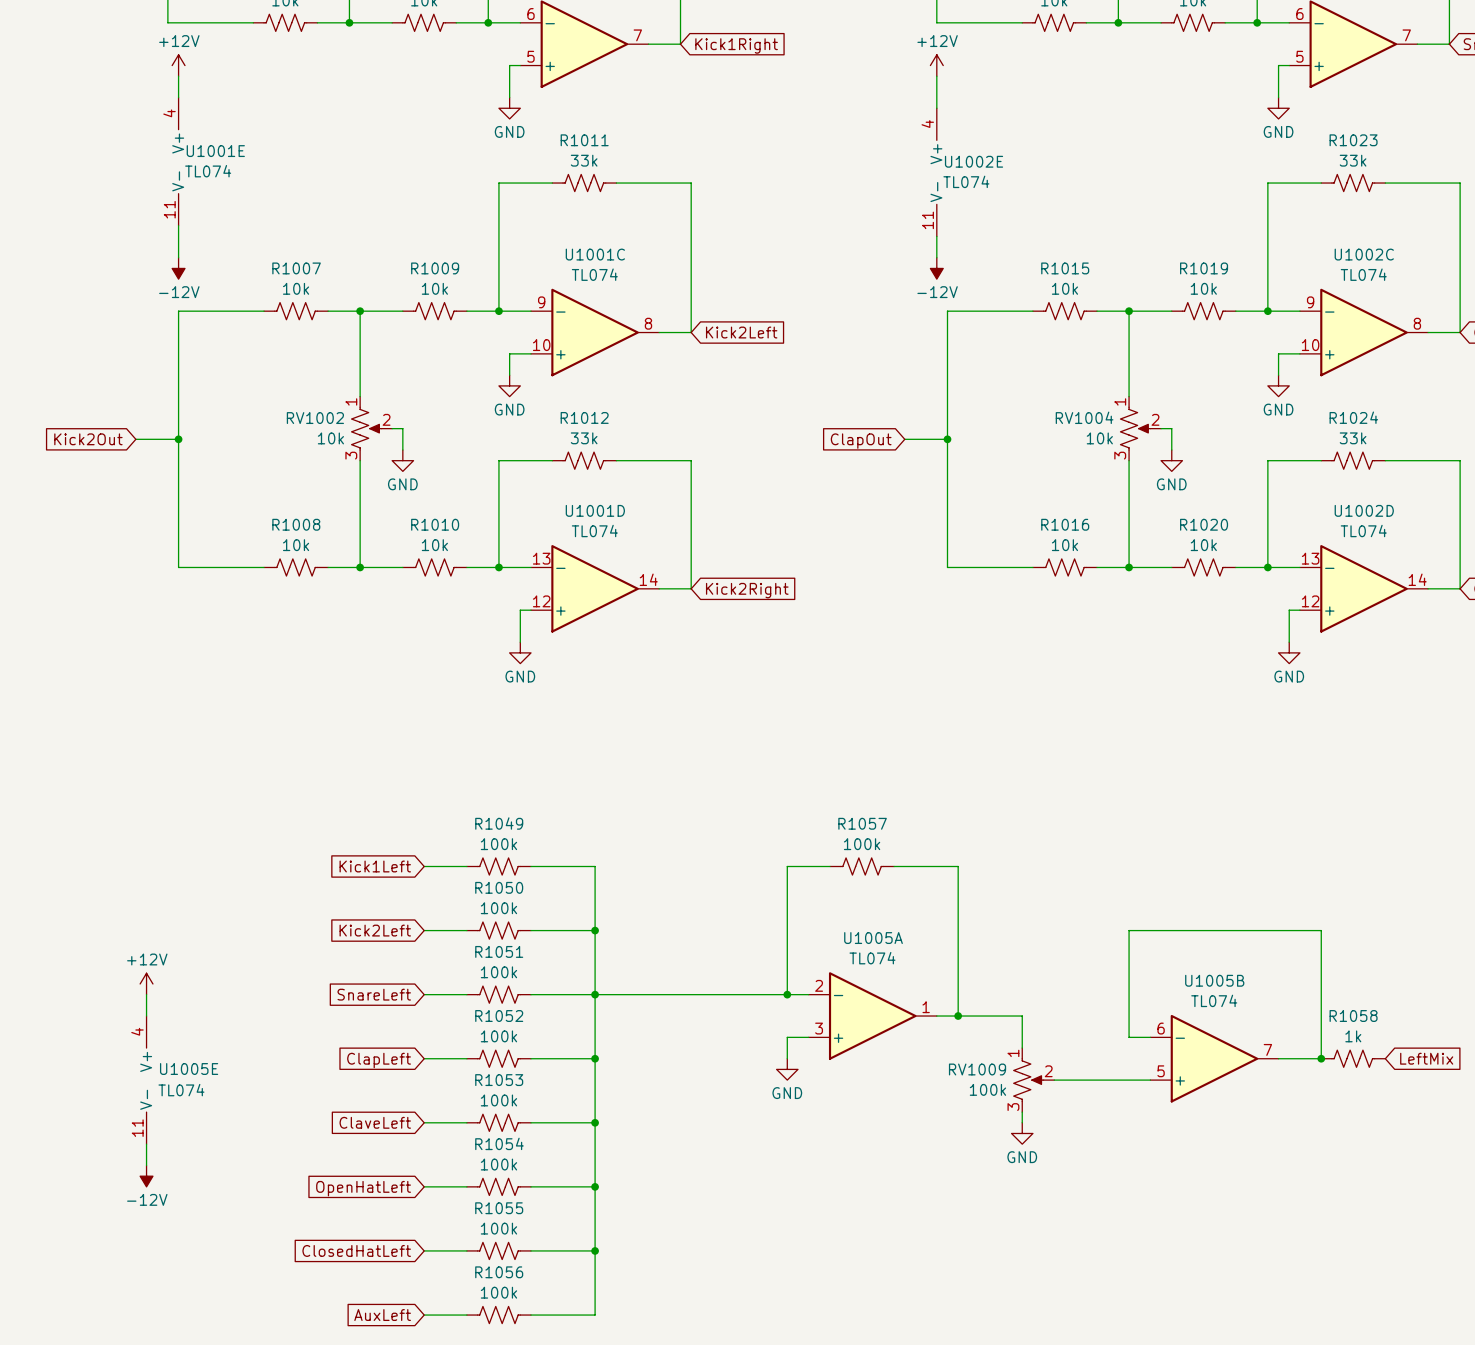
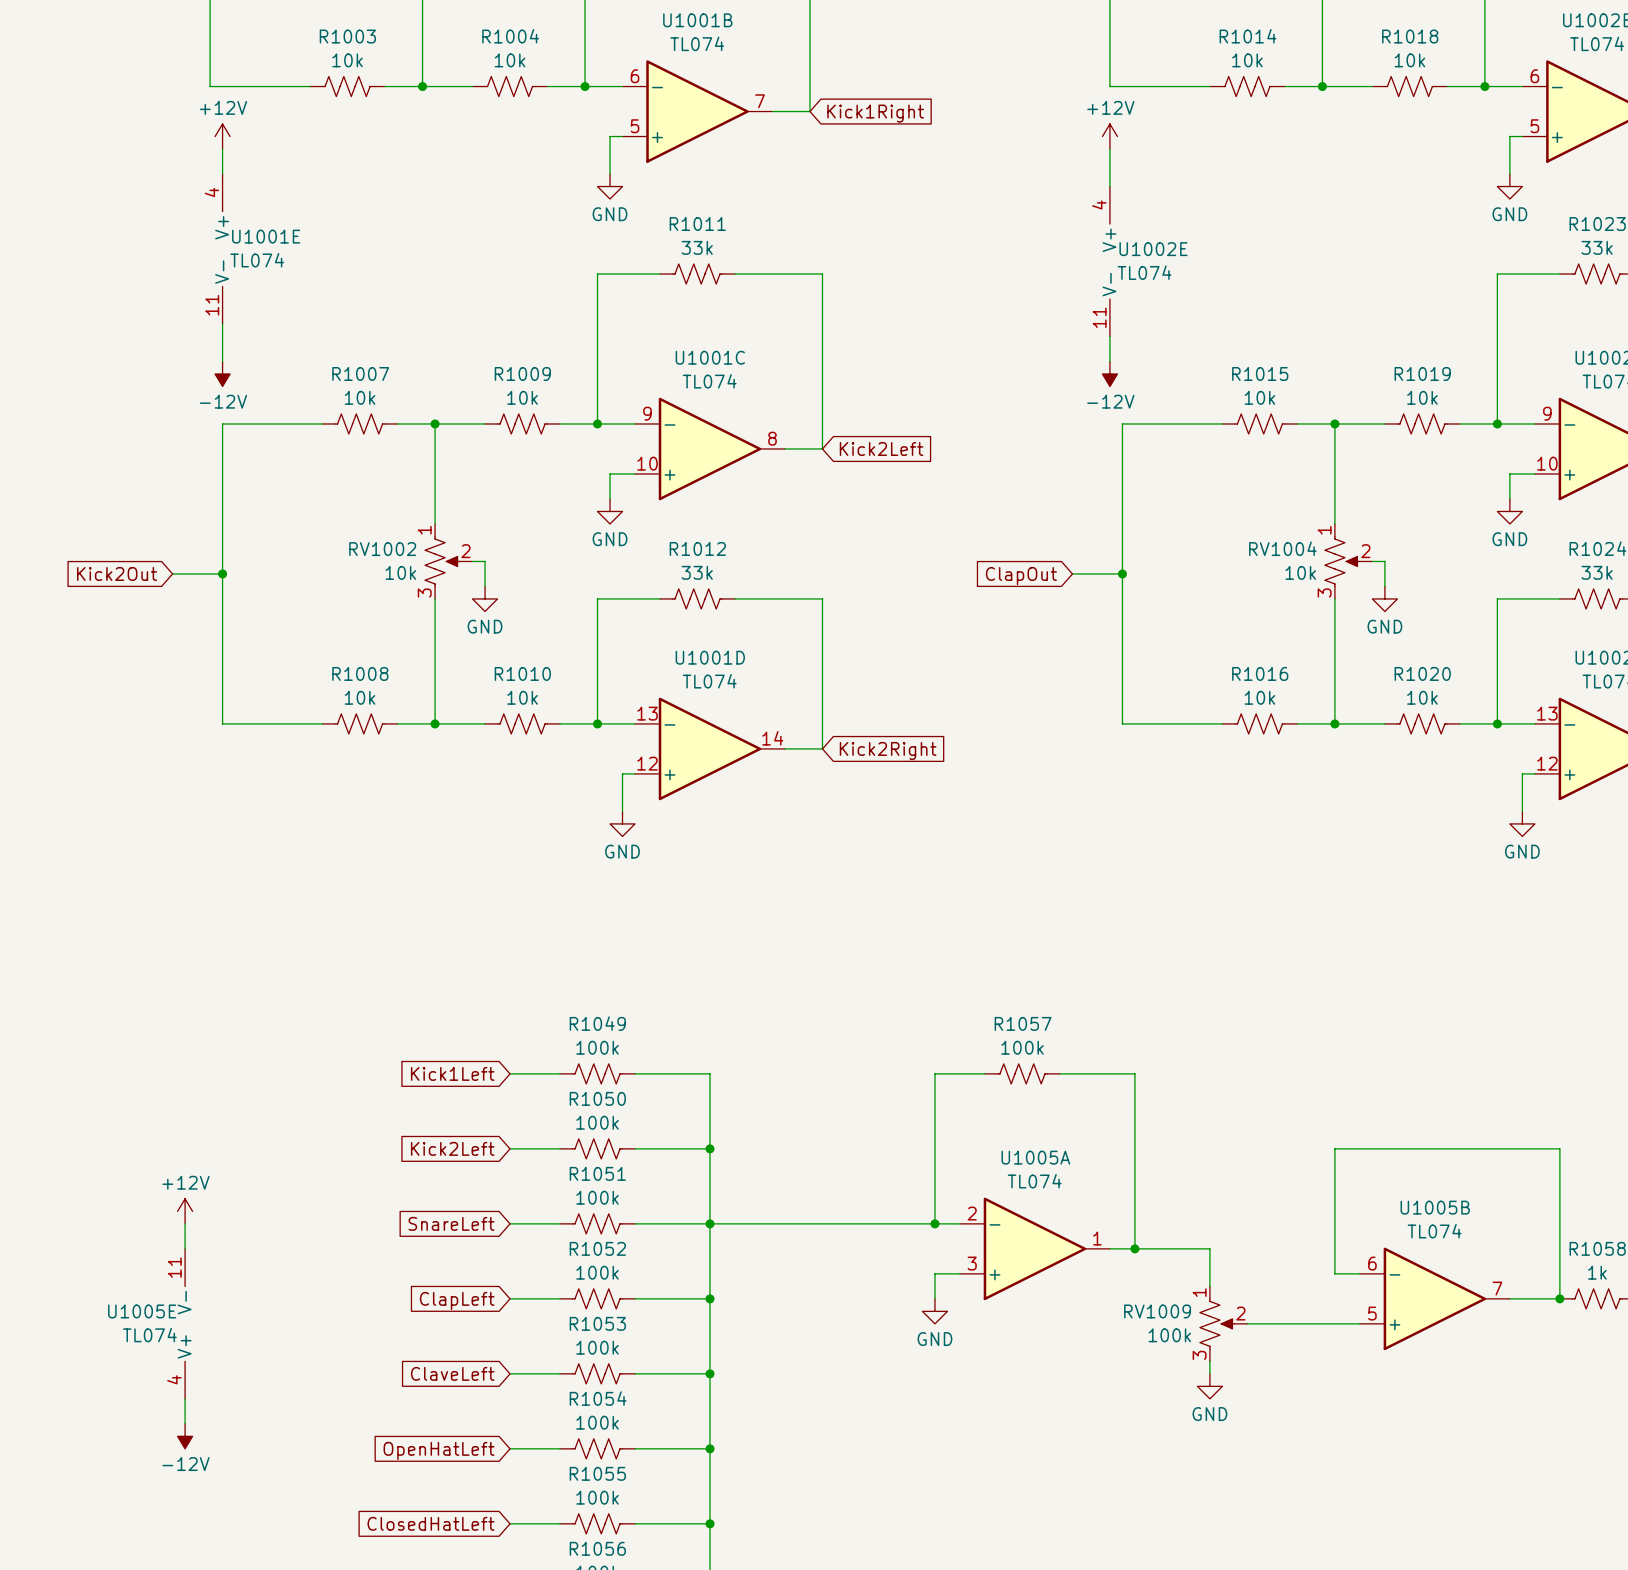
U1005E name position: U1005E (189, 1069) -> U1005E (142, 1311)
U1005E rotation: 0° (146, 1080) -> 180° (185, 1323)
U1005E value position: TL074 (181, 1090) -> TL074 (149, 1335)

